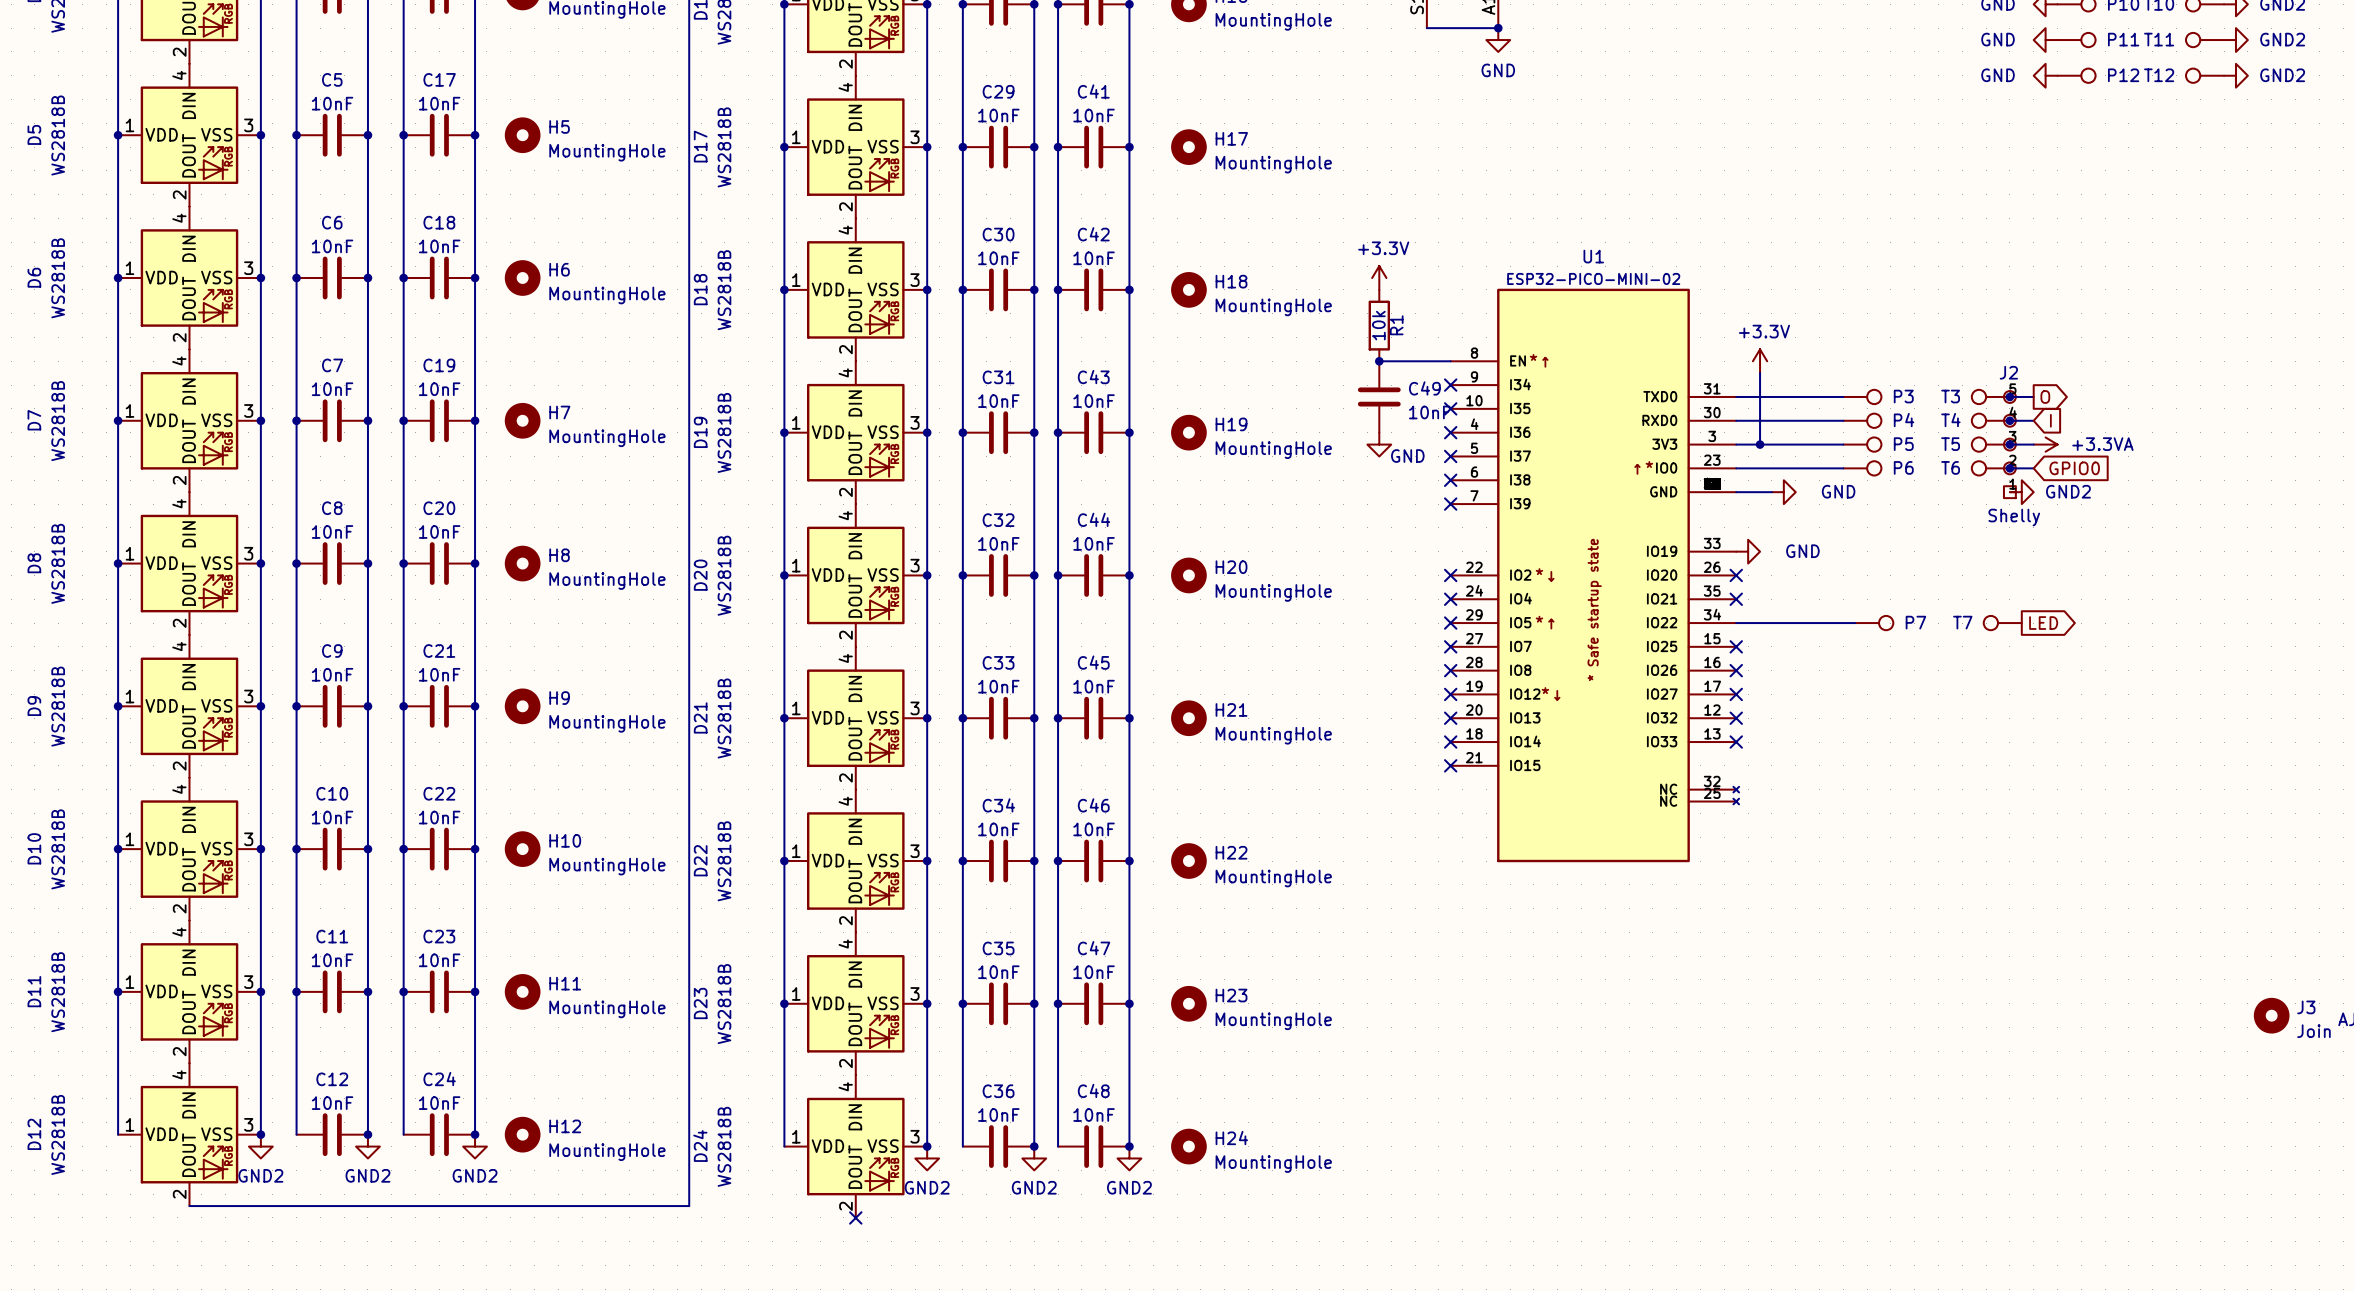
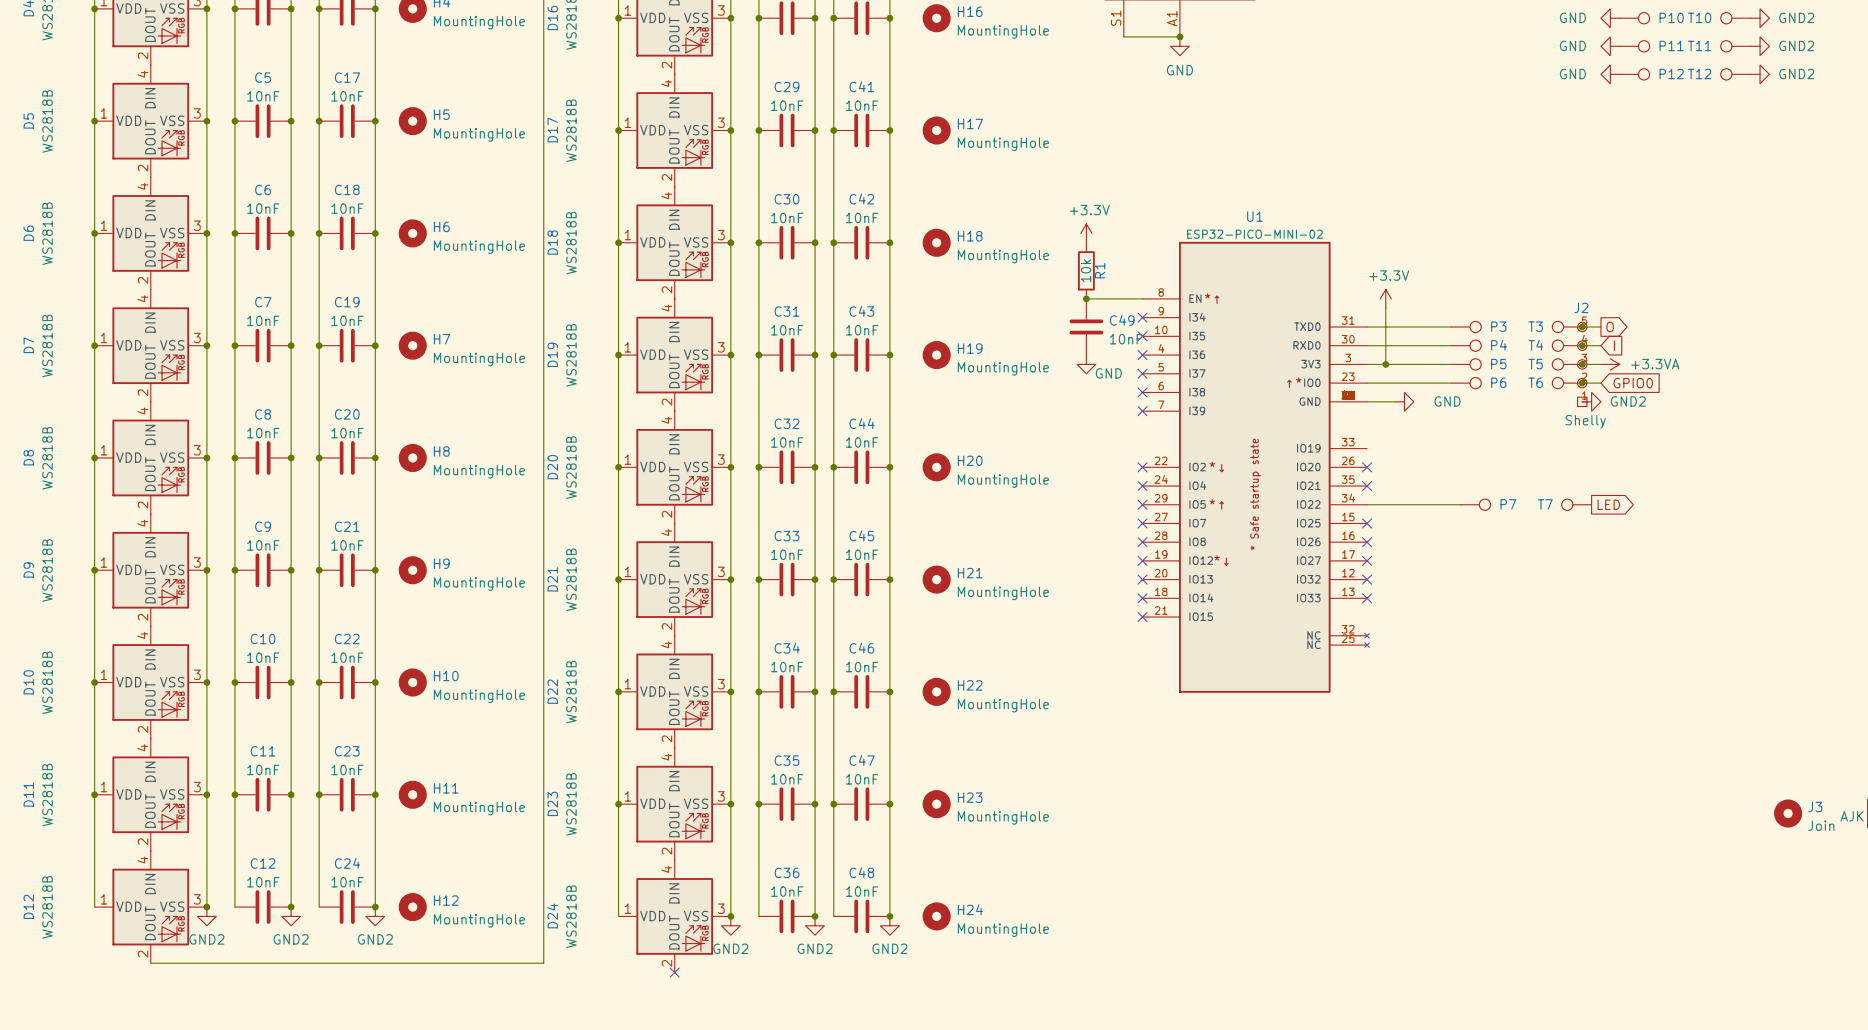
power symbol: GND (1748, 551) -> none

